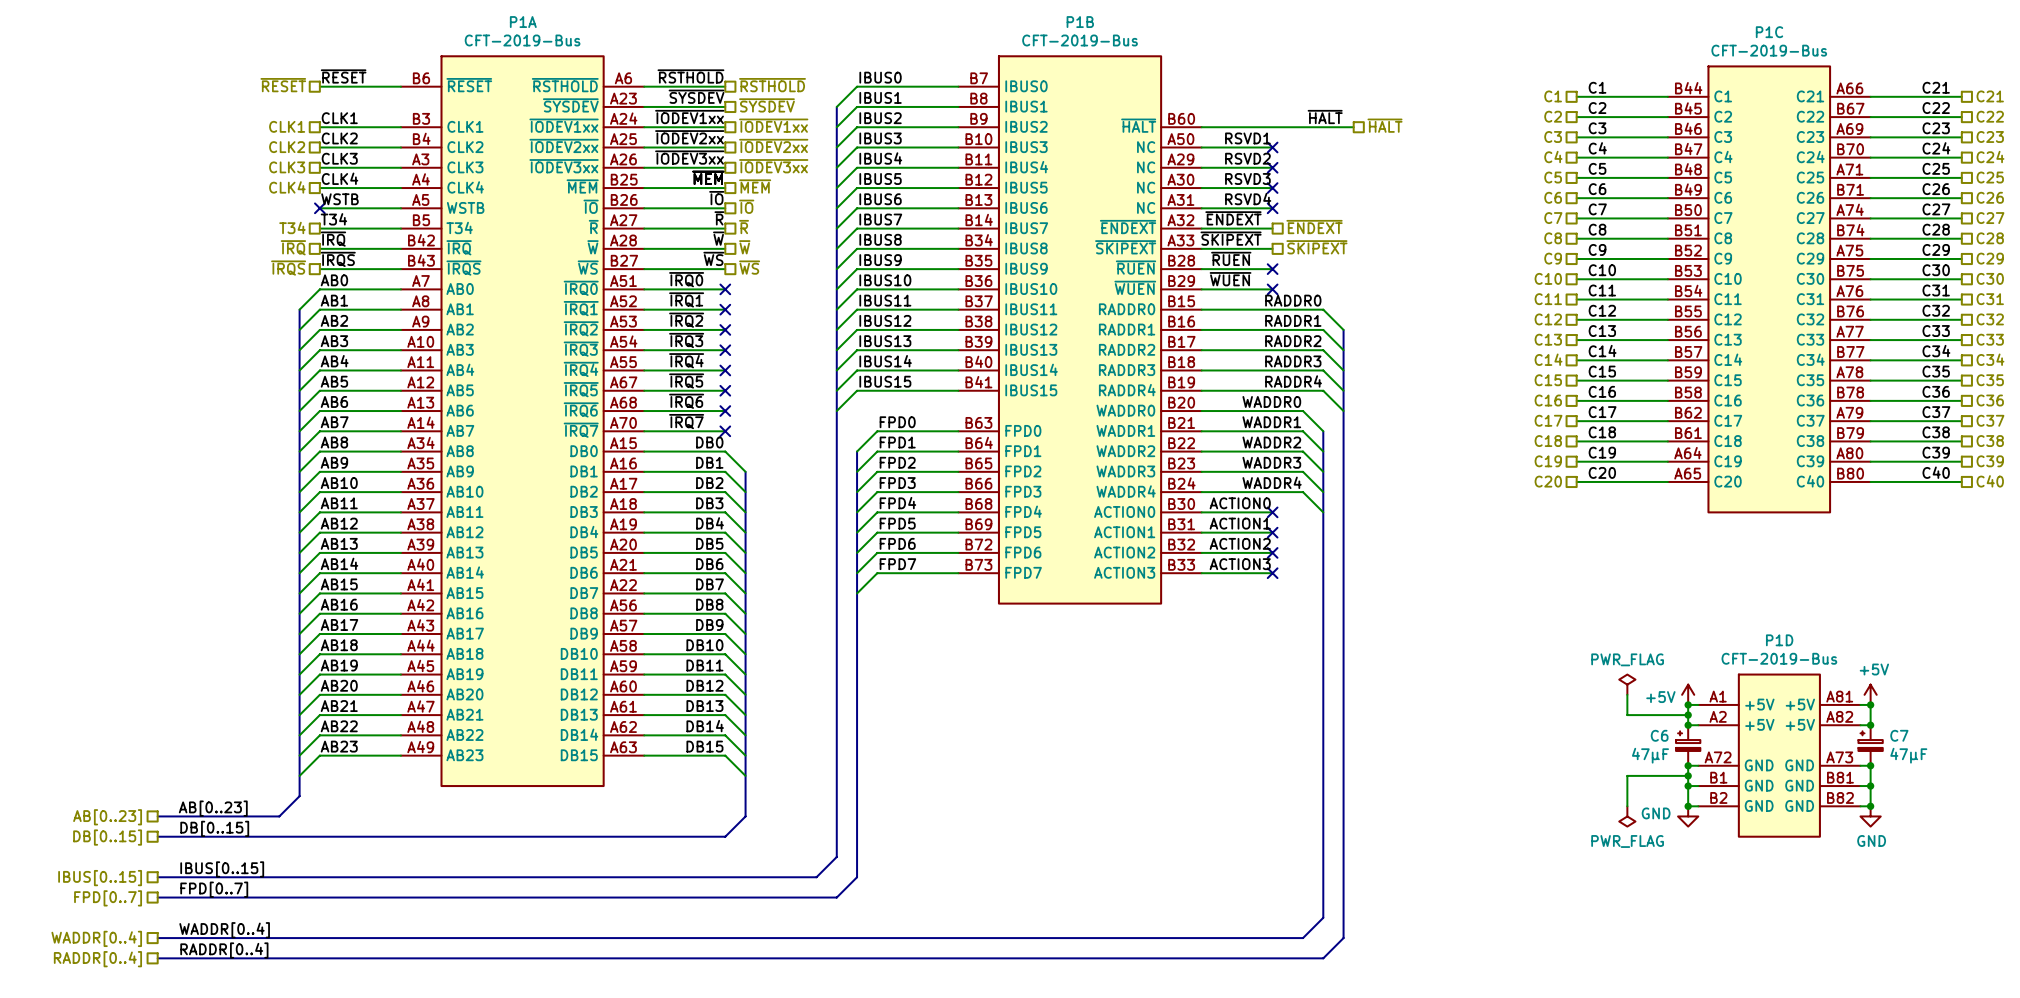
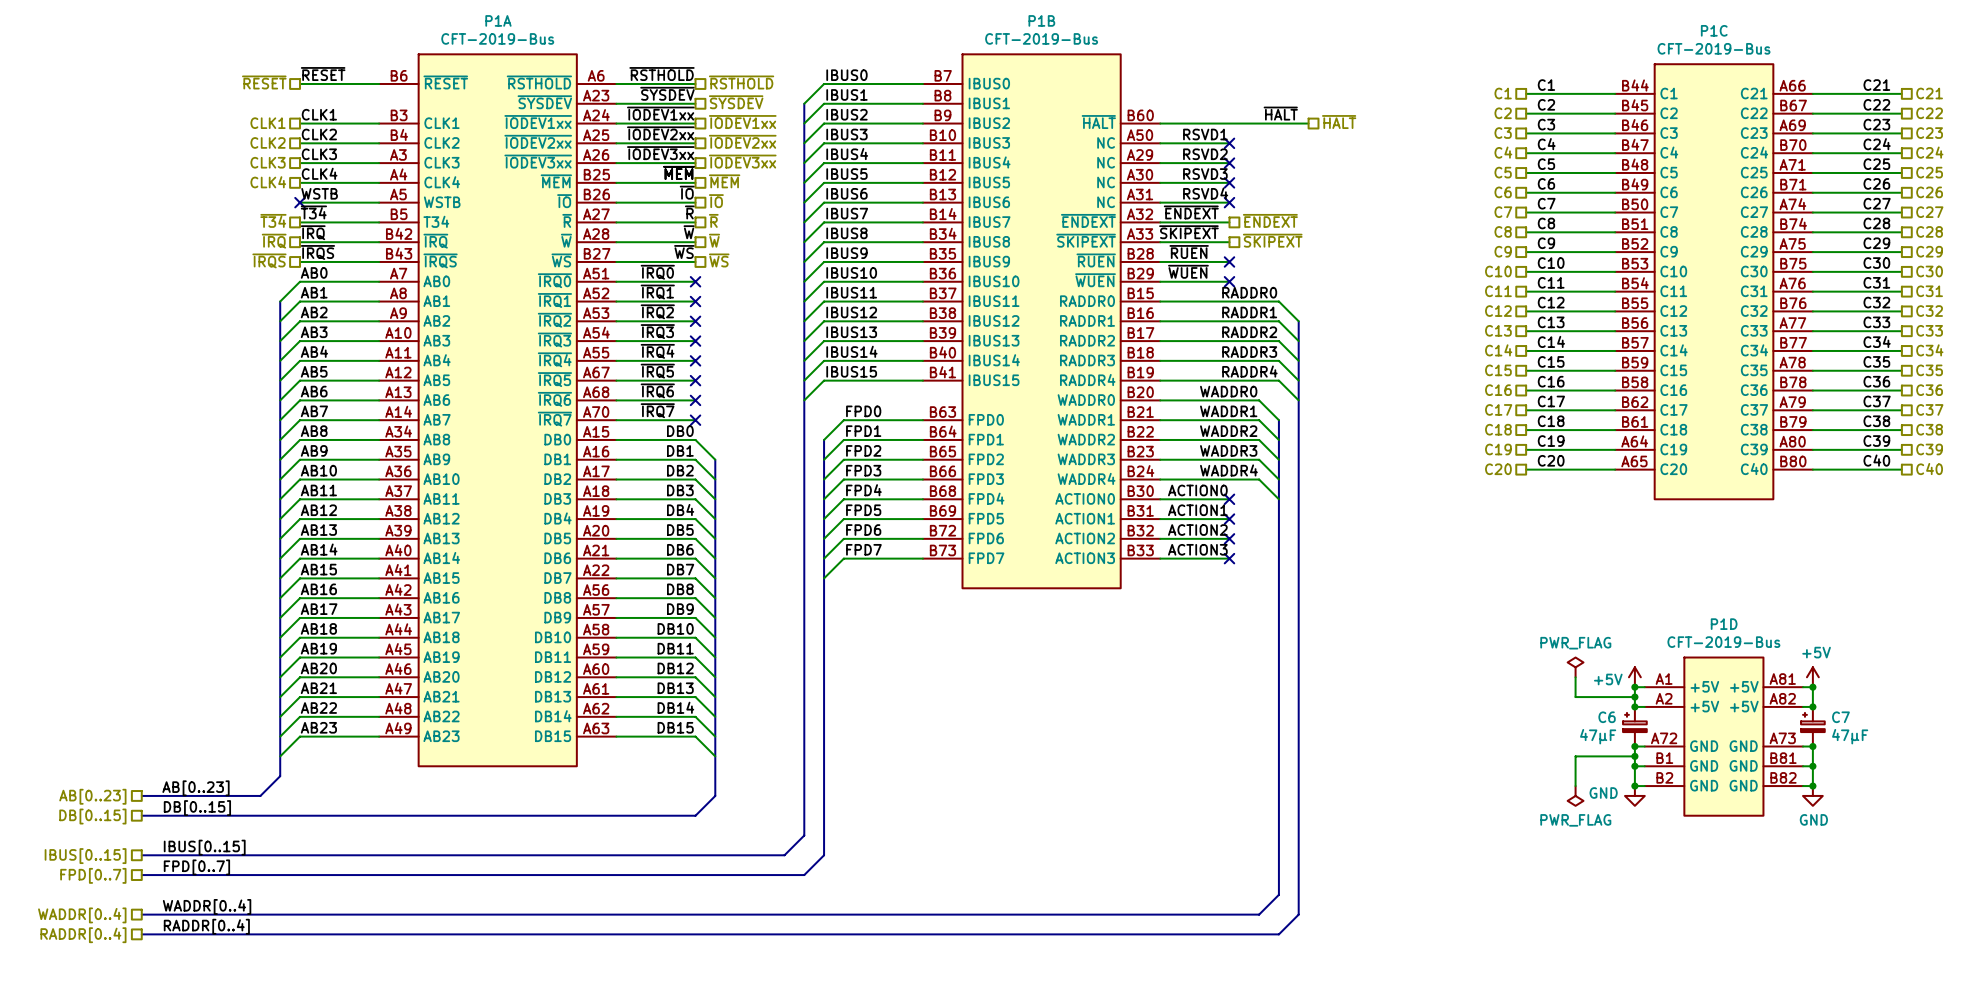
label: T34 (333, 219) -> ~{T34} (313, 212)
hierarchical label: T34 (292, 227) -> ~{T34} (273, 220)

